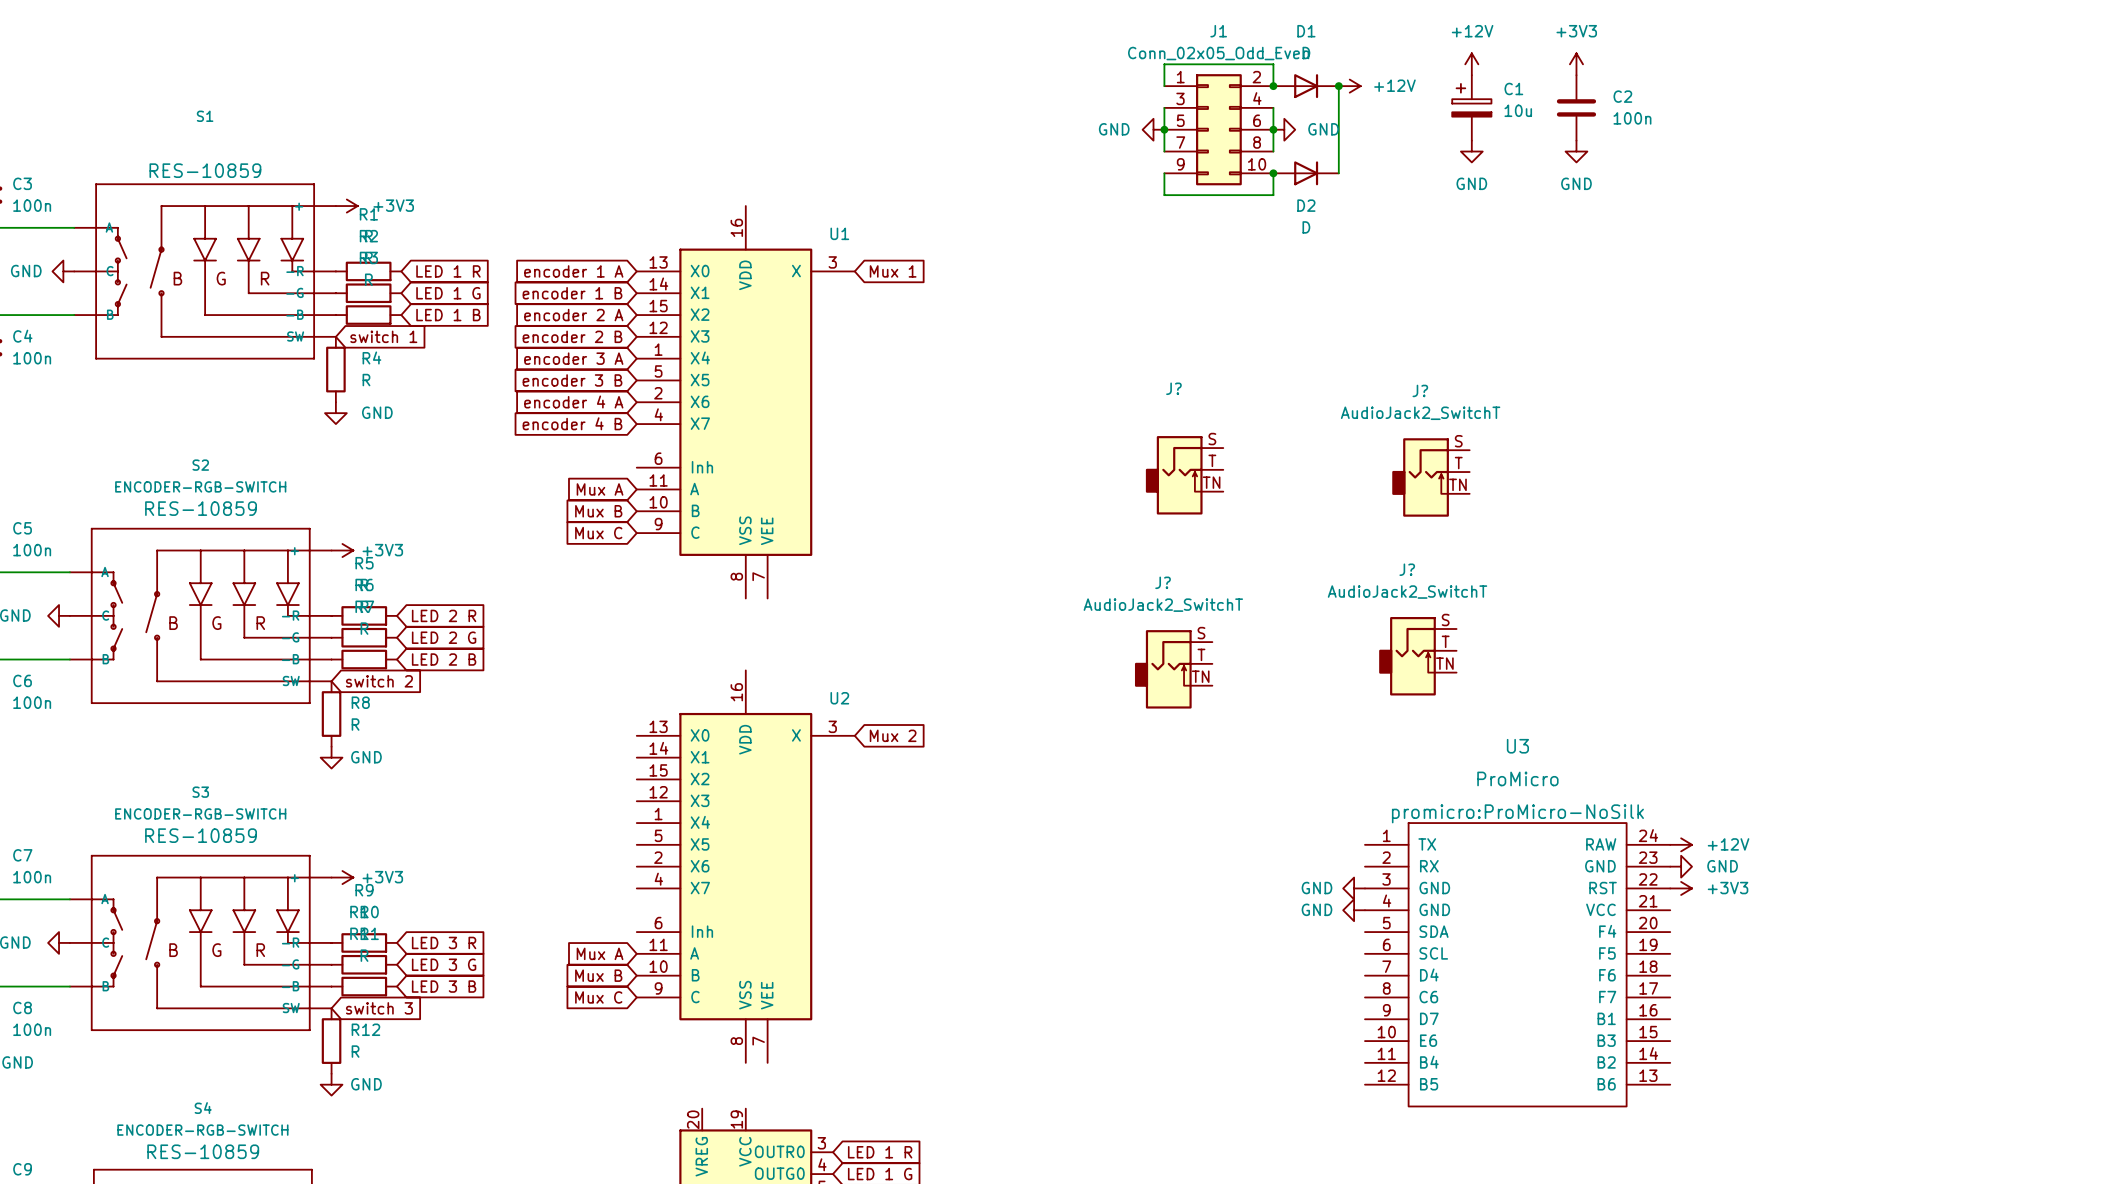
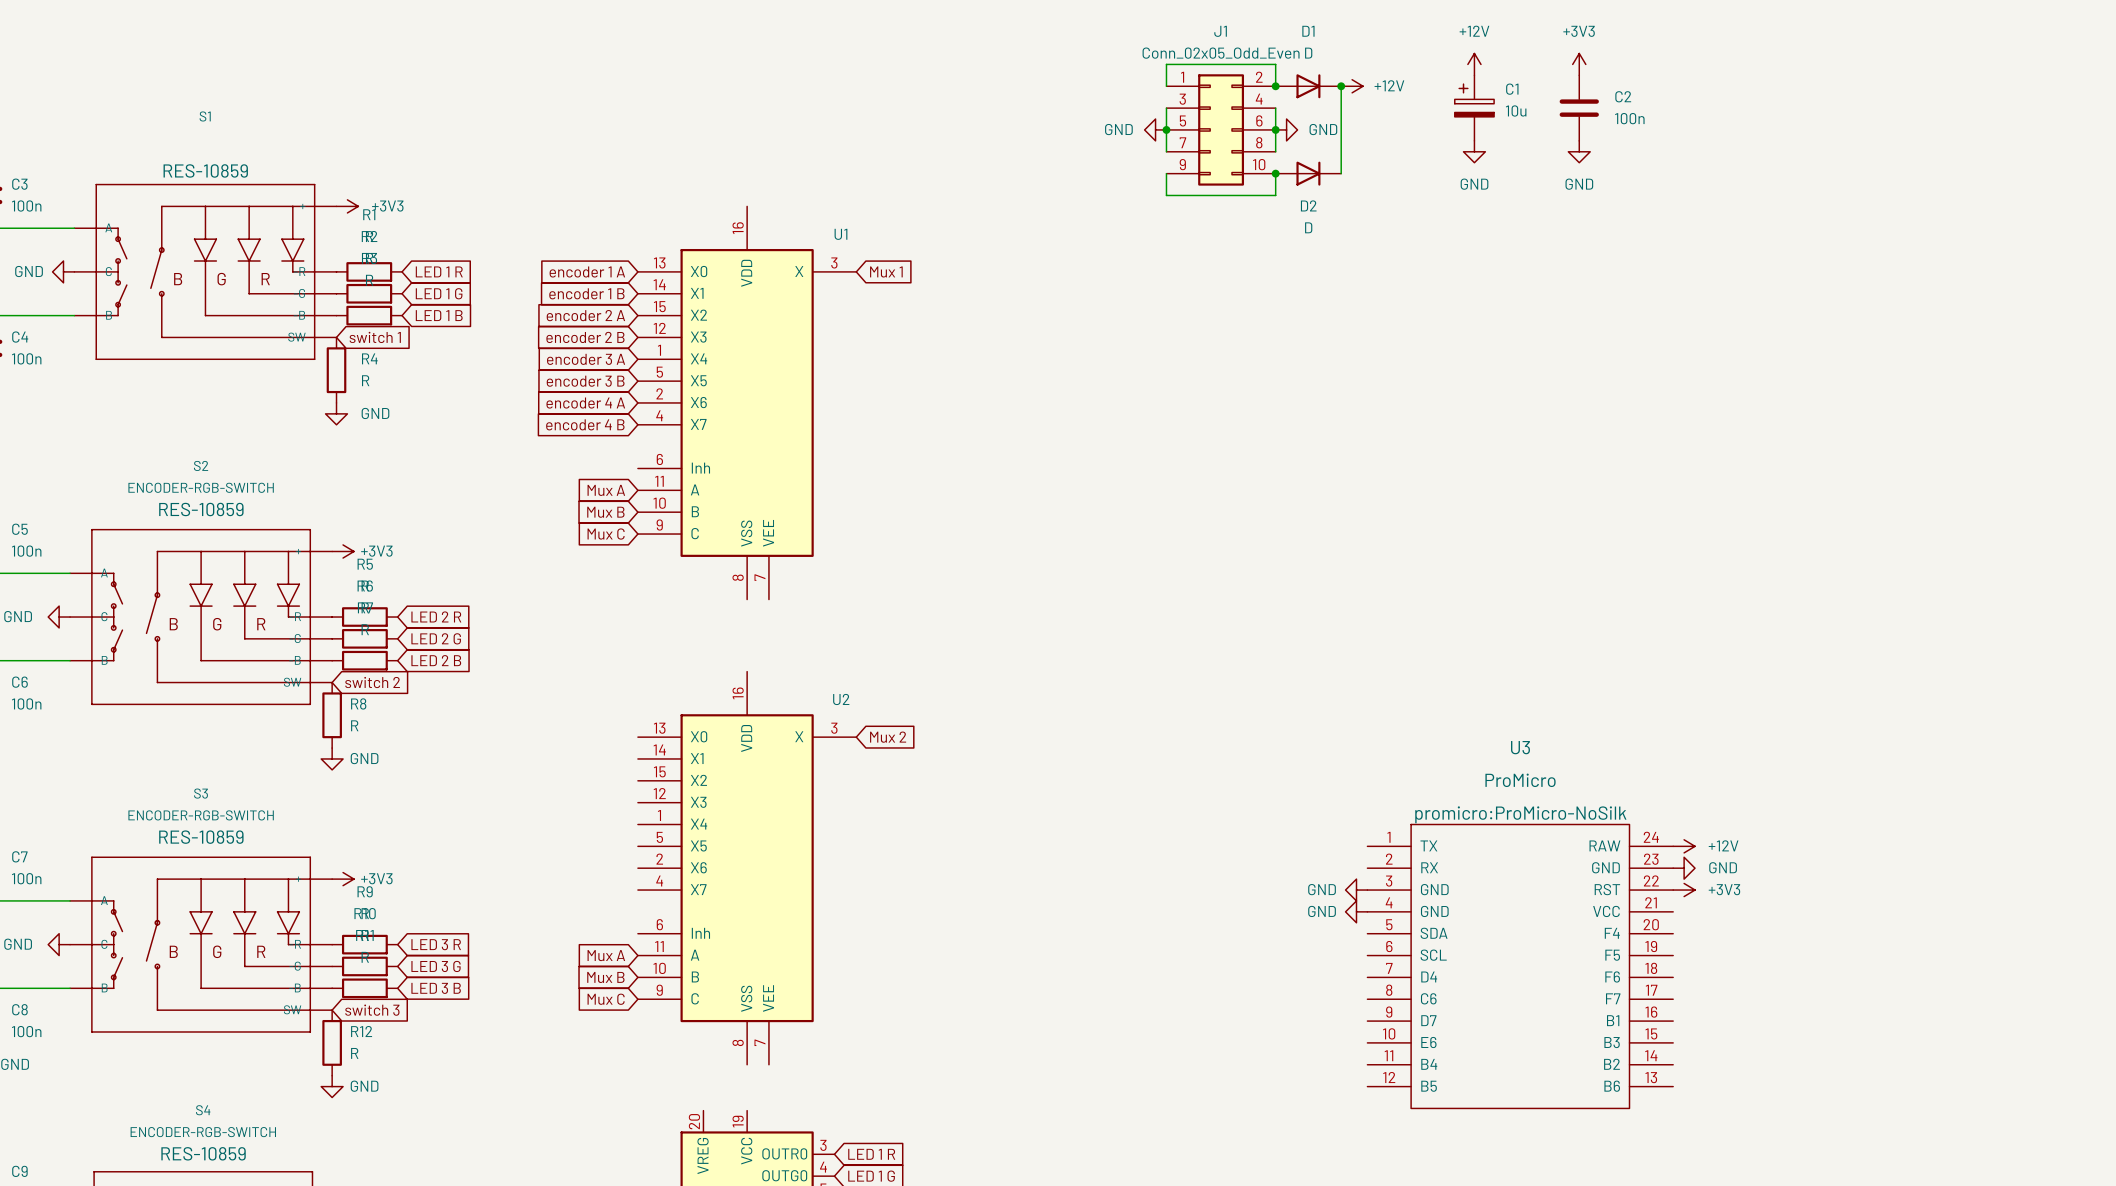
J?: (1184, 475) -> none
J?: AudioJack2_SwitchT (1430, 477) -> none
J?: AudioJack2_SwitchT (1417, 656) -> none
J?: AudioJack2_SwitchT (1173, 669) -> none

